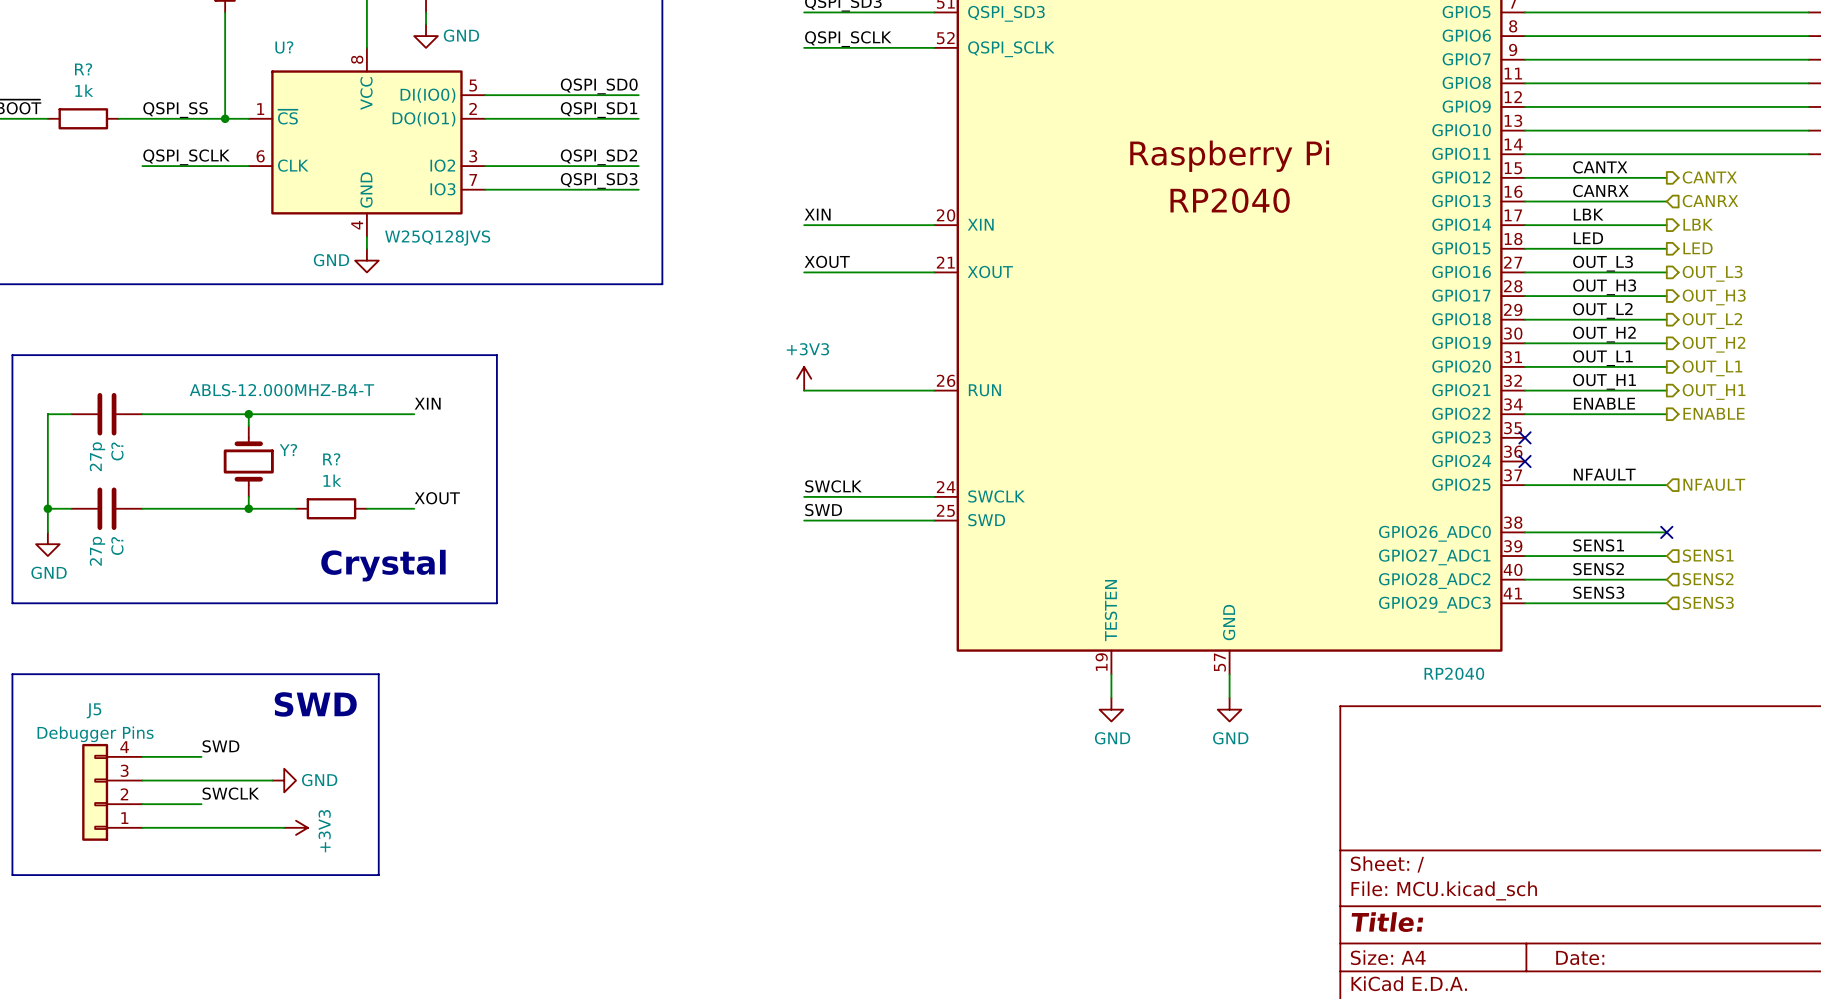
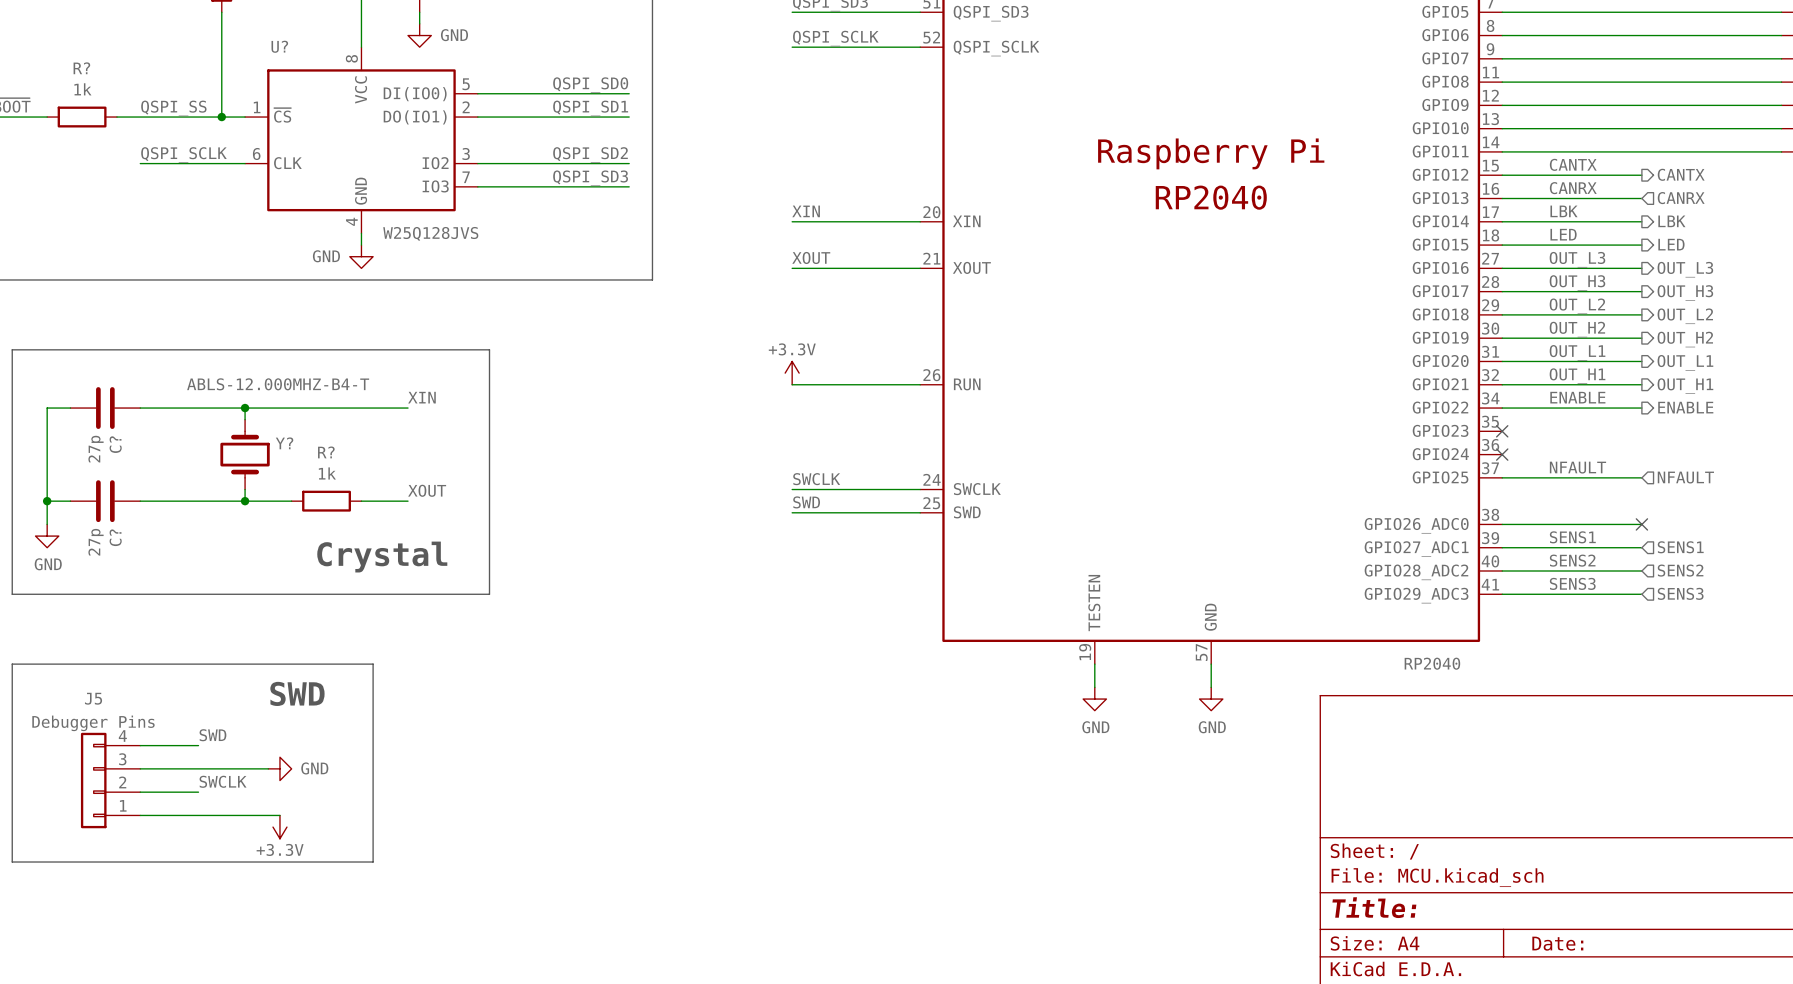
power symbol: +3V3 (804, 378) -> +3.3V (792, 373)
power symbol: +3V3 (296, 827) -> none
power symbol: none -> +3.3V (279, 827)

